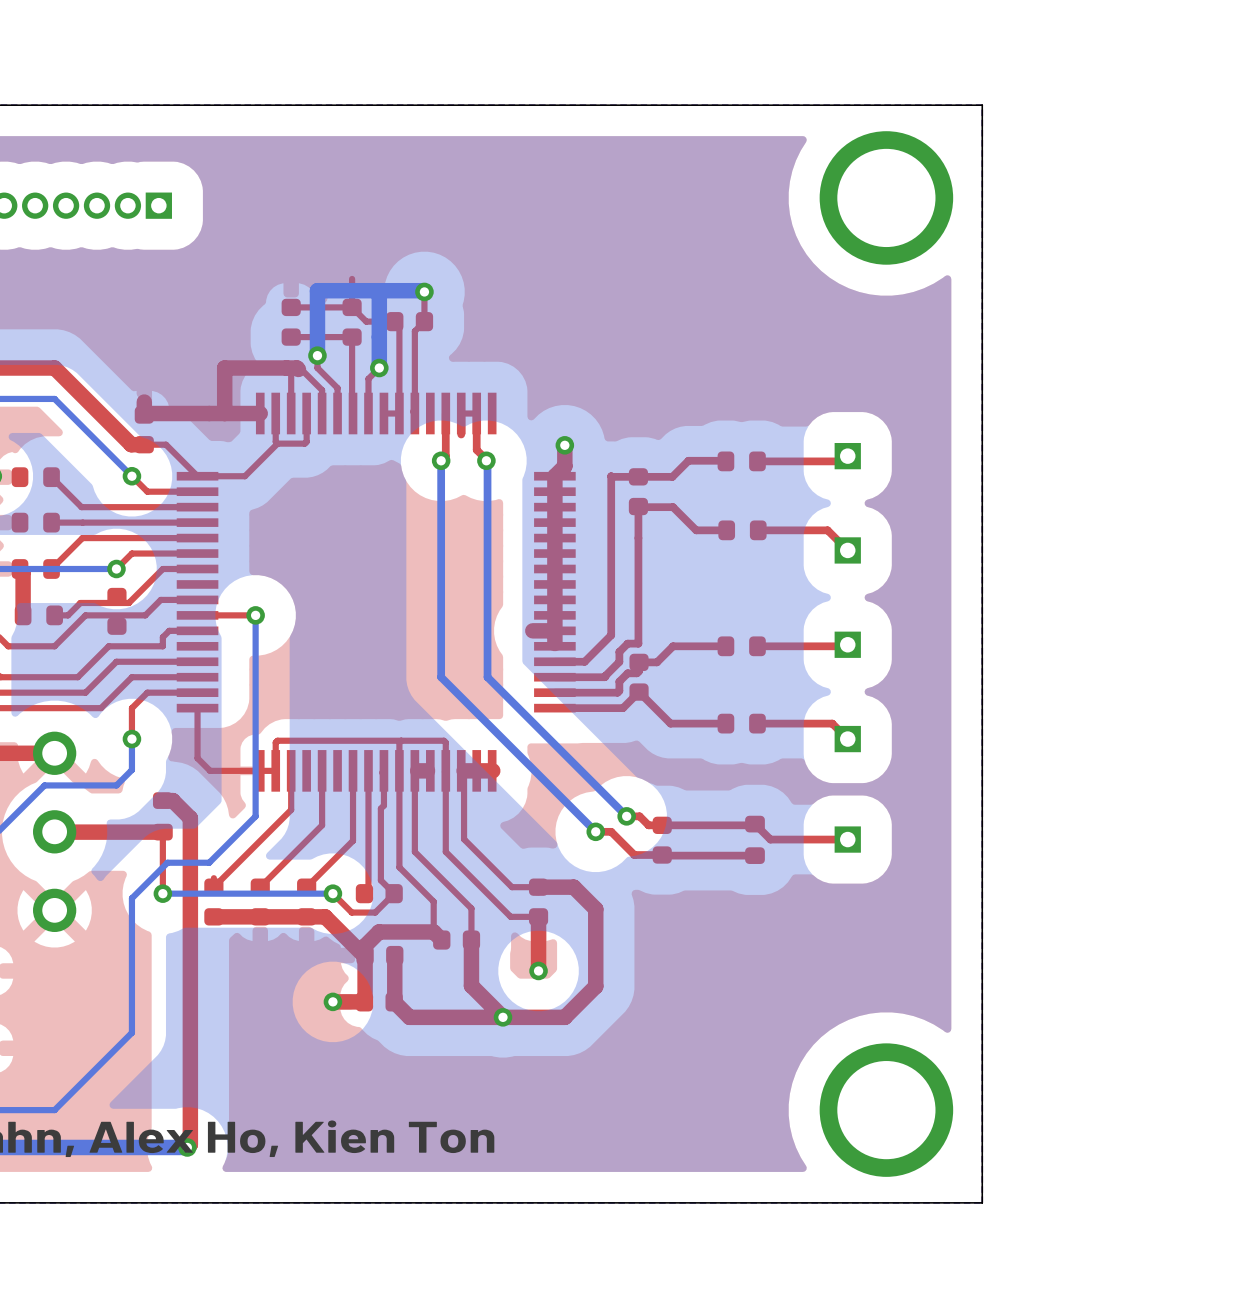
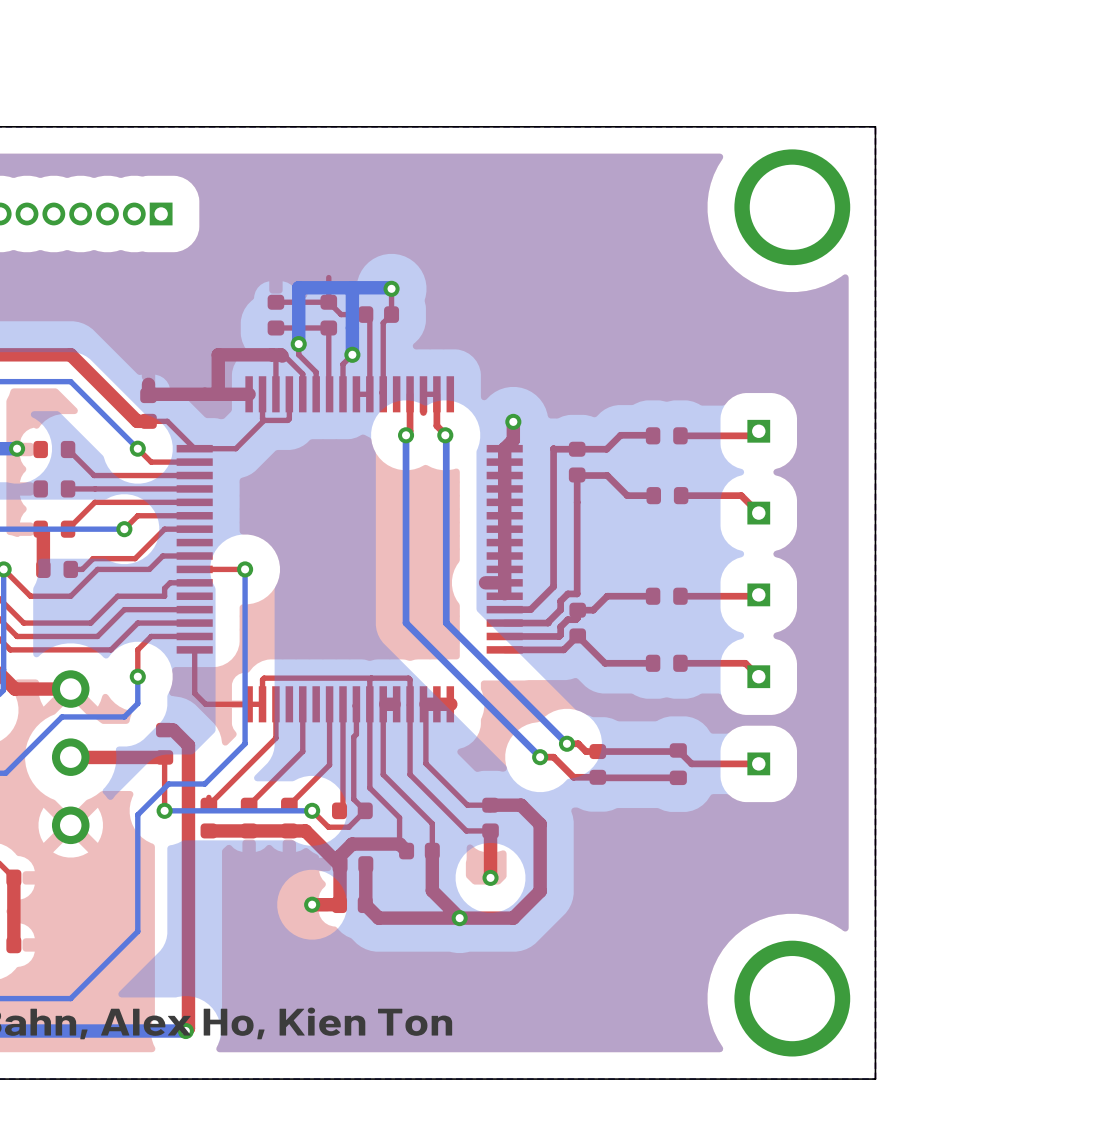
part: (116, 611) -> none

